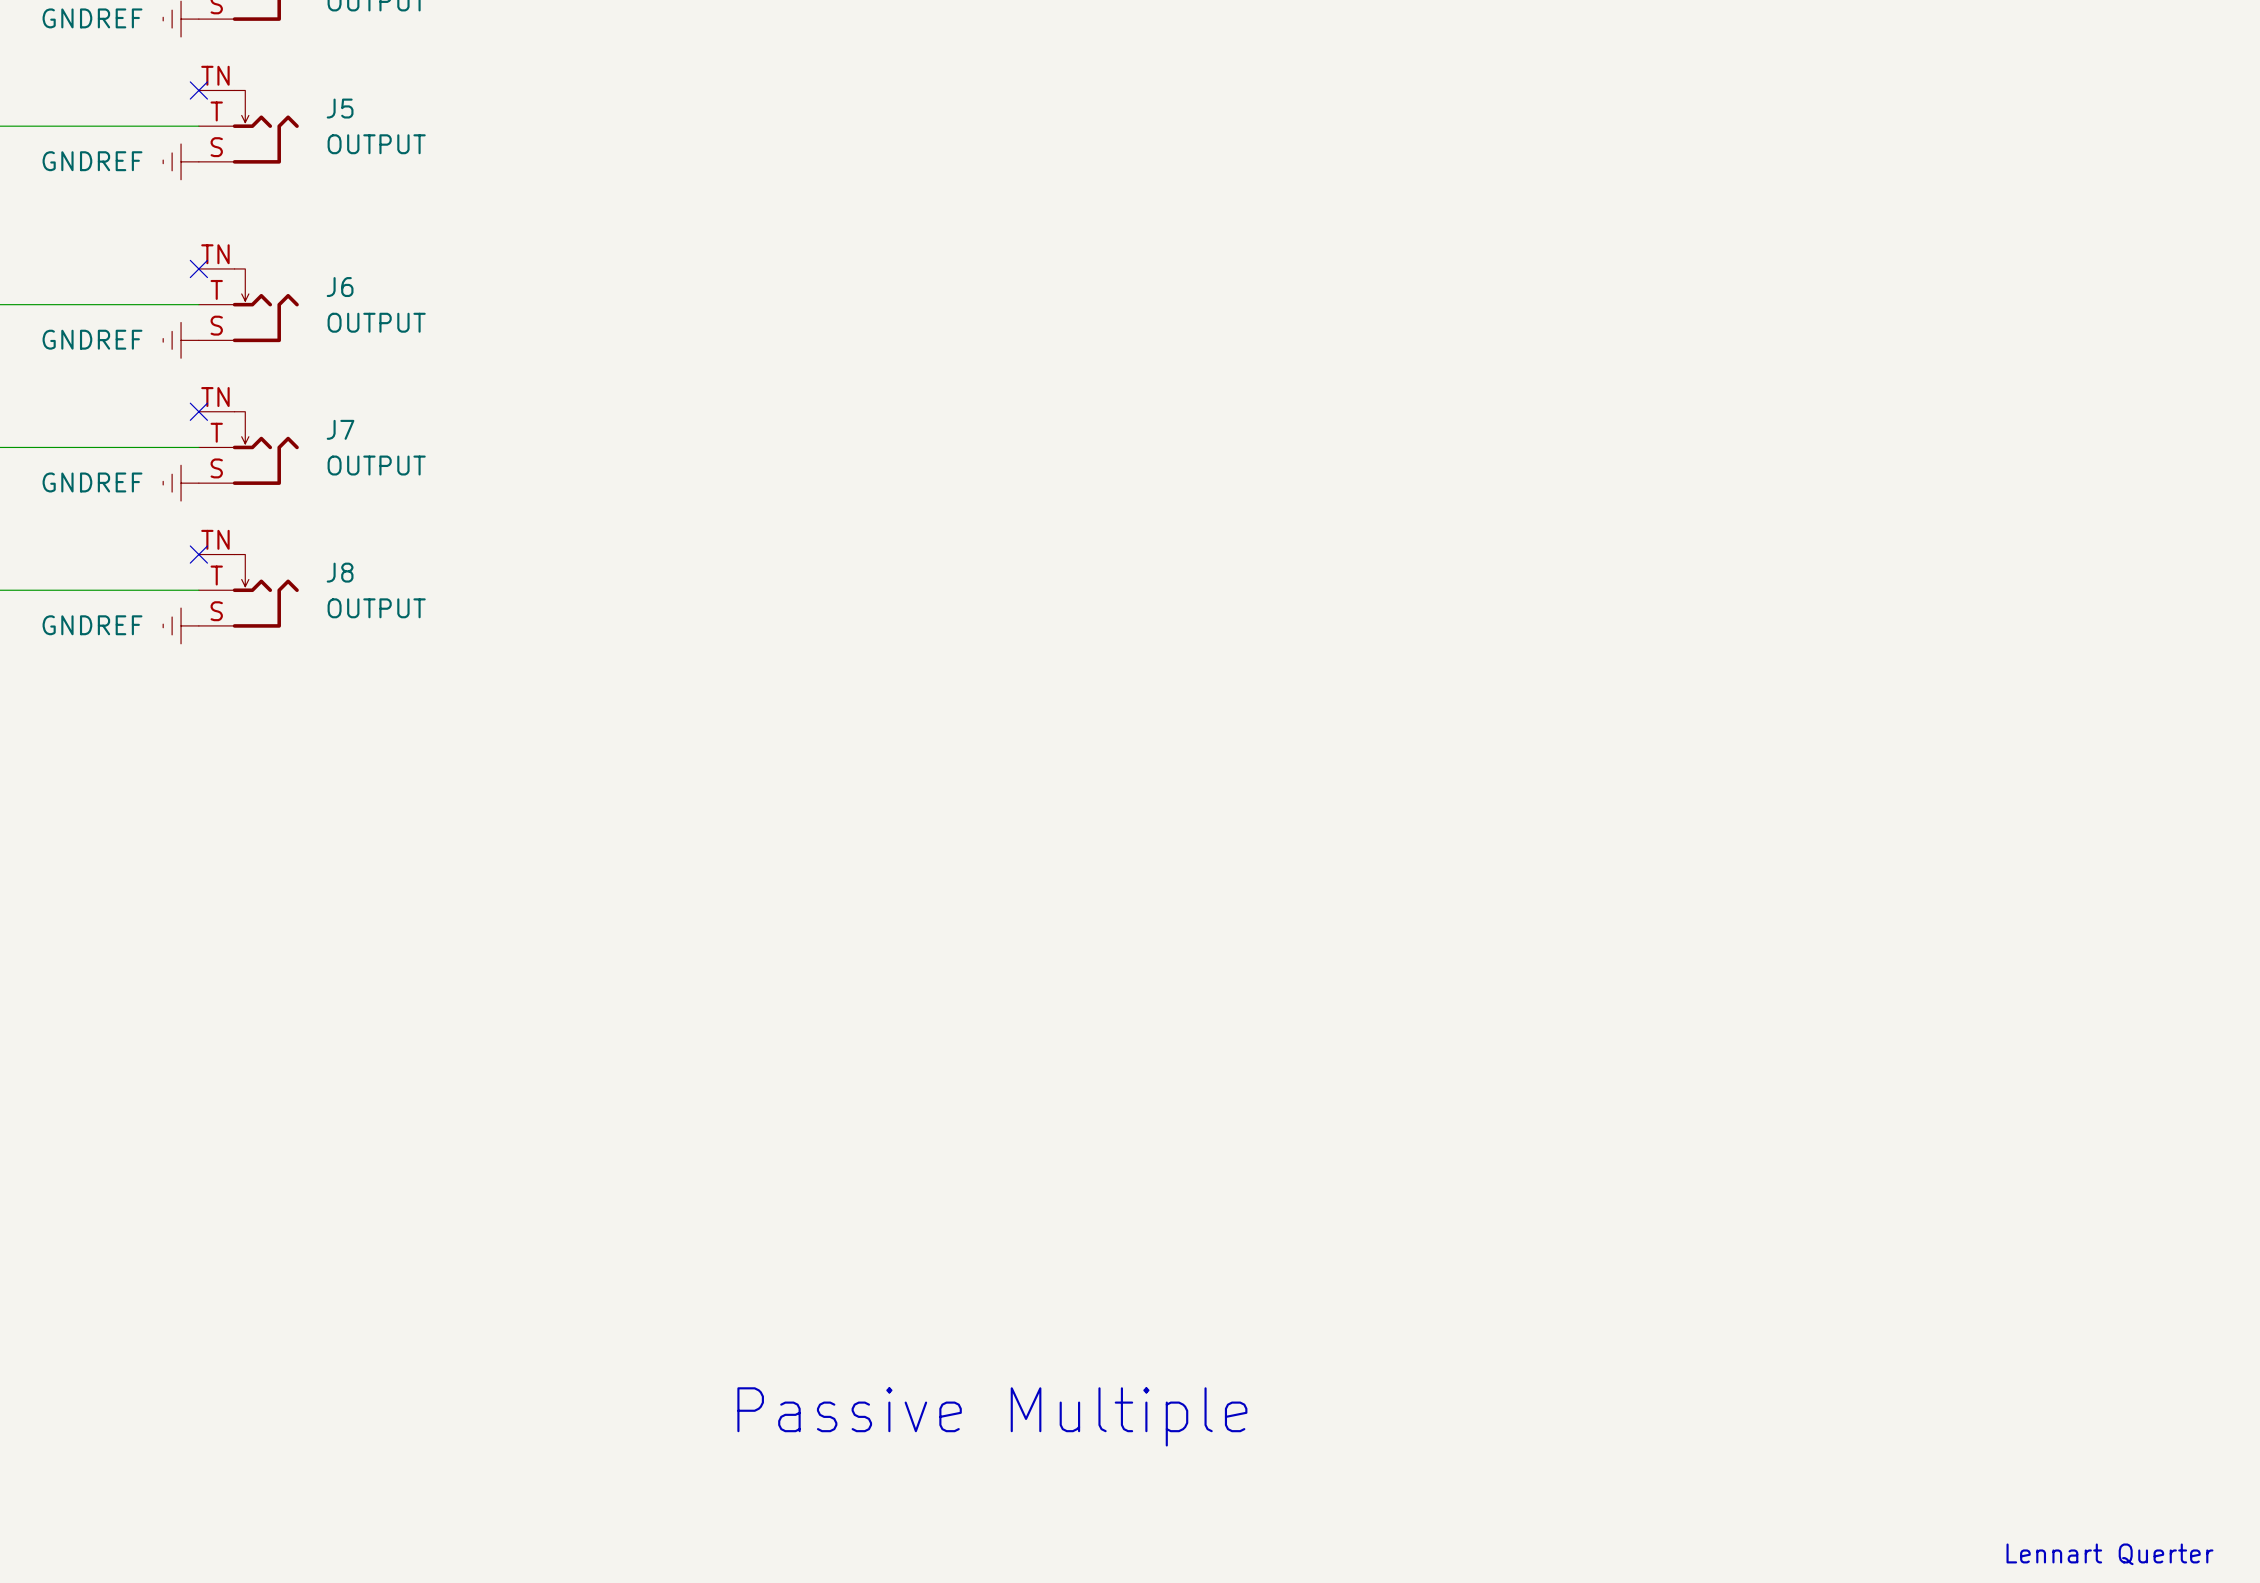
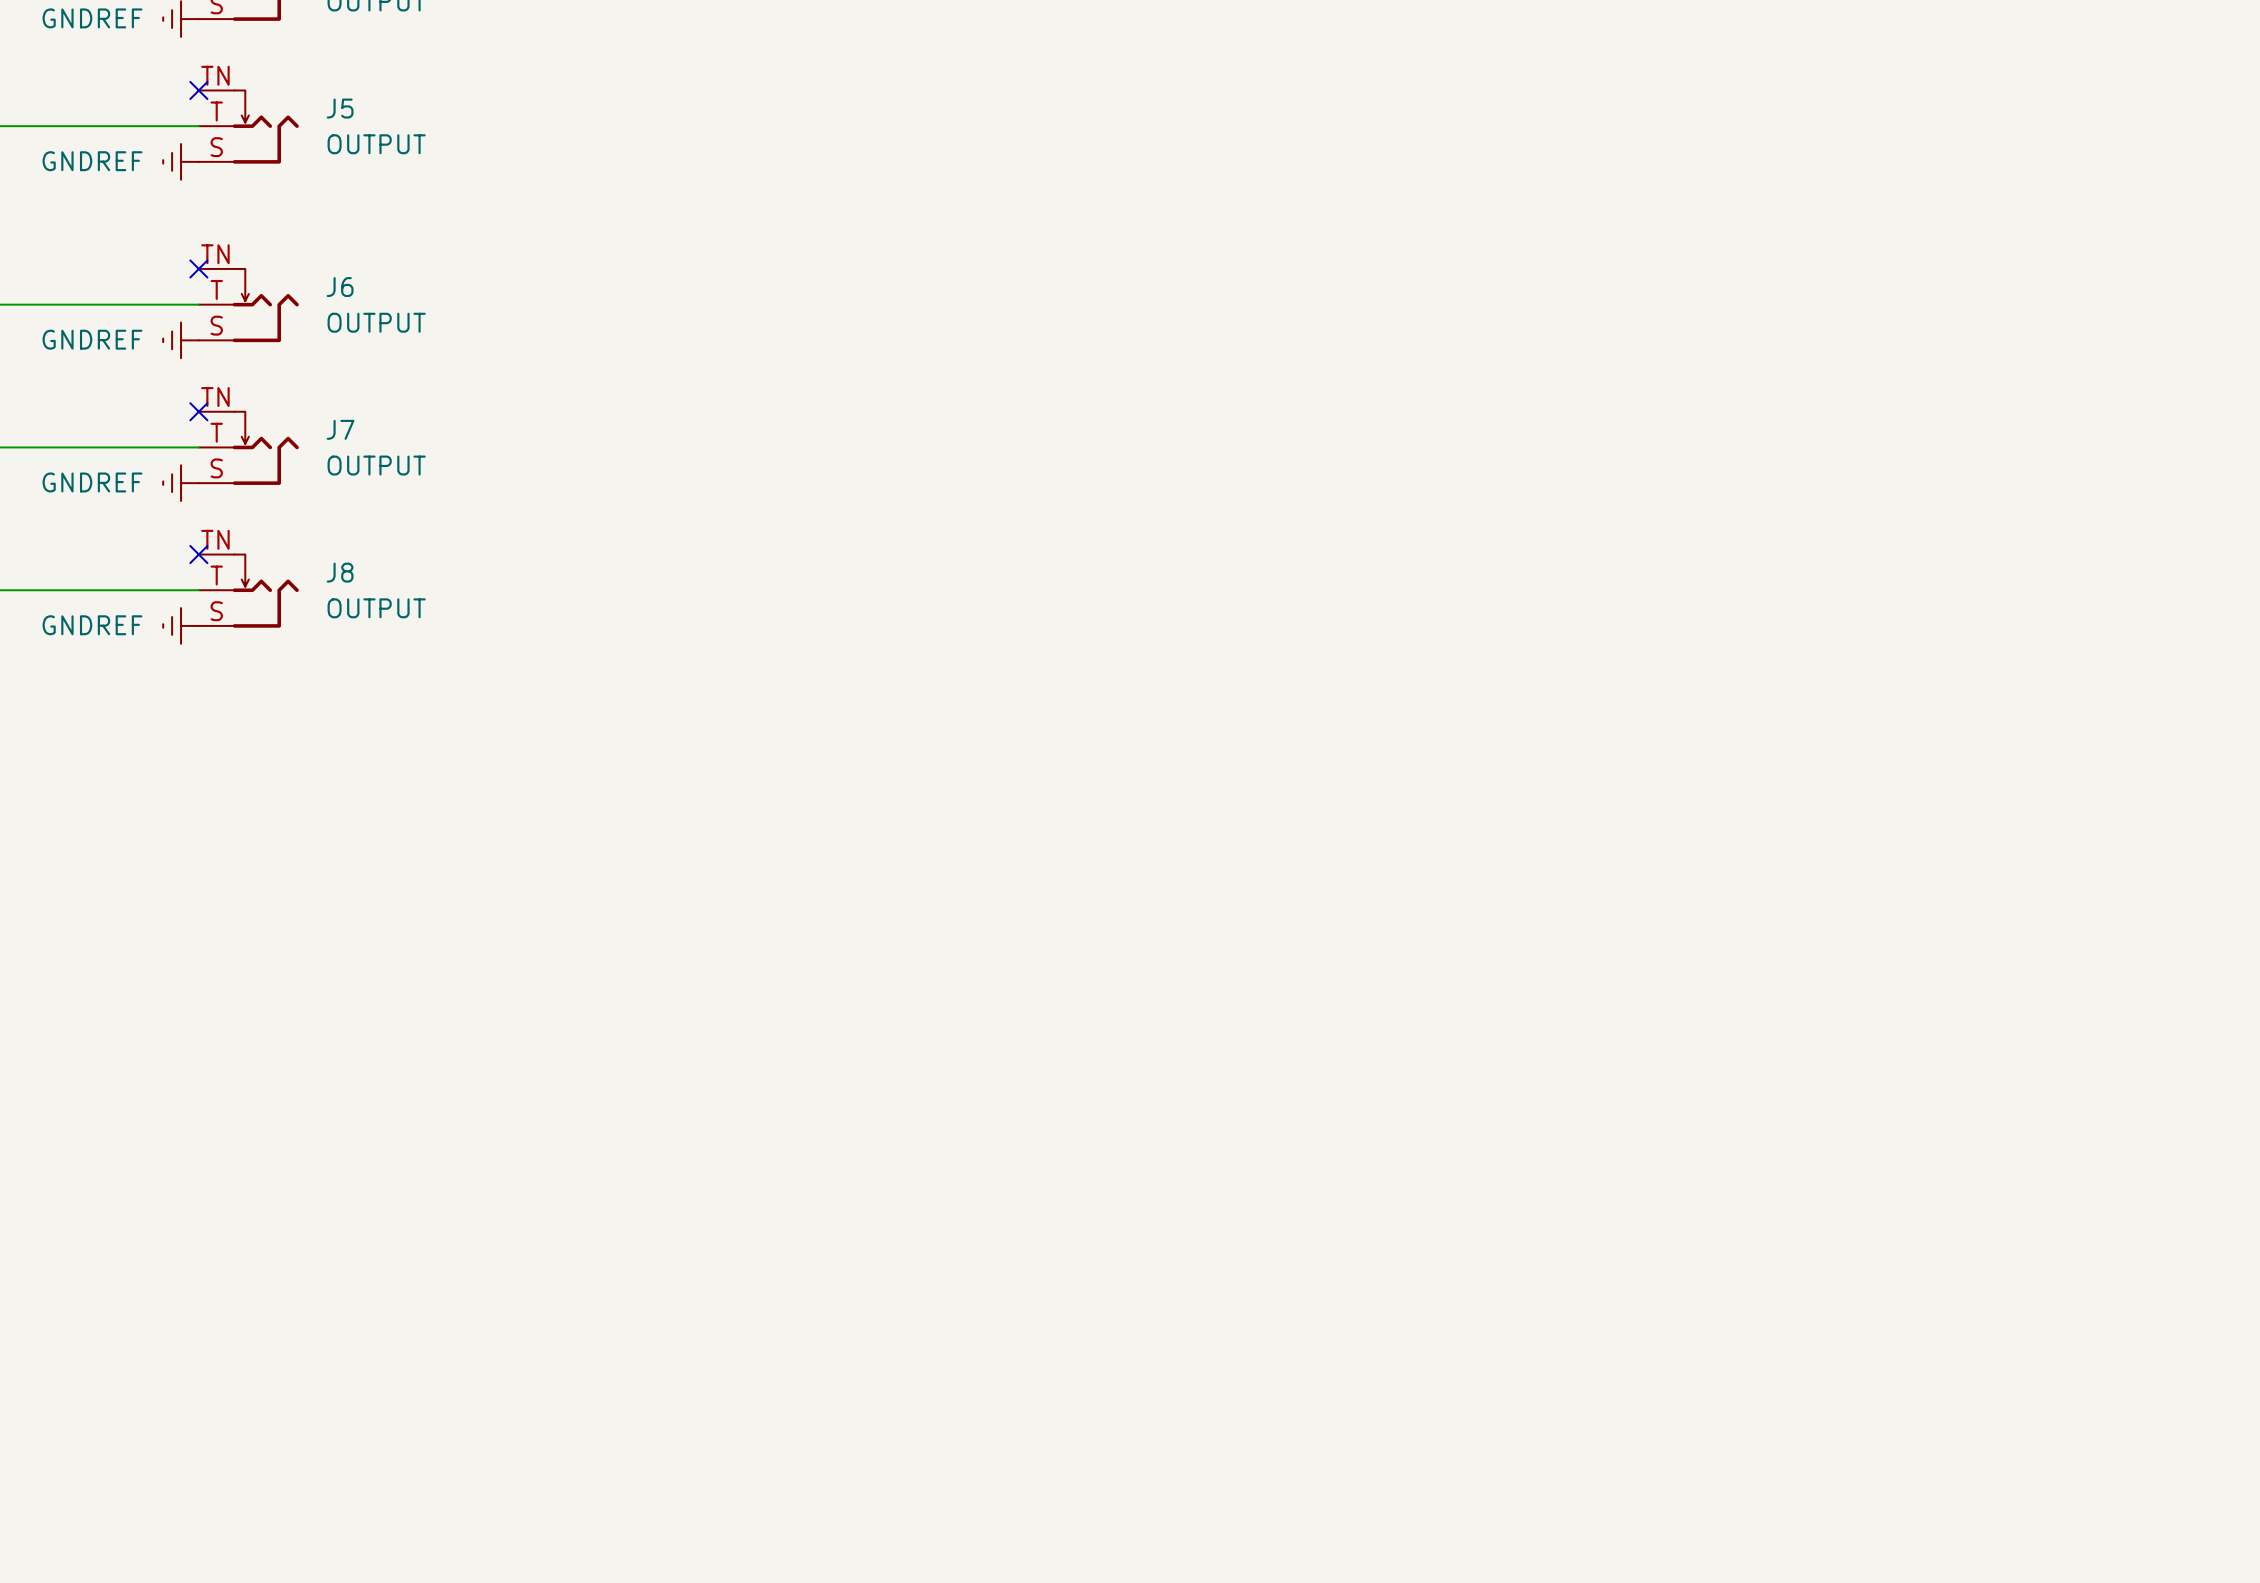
text: Passive Multiple (992, 1416) -> none
text: Lennart Querter (2109, 1554) -> none

